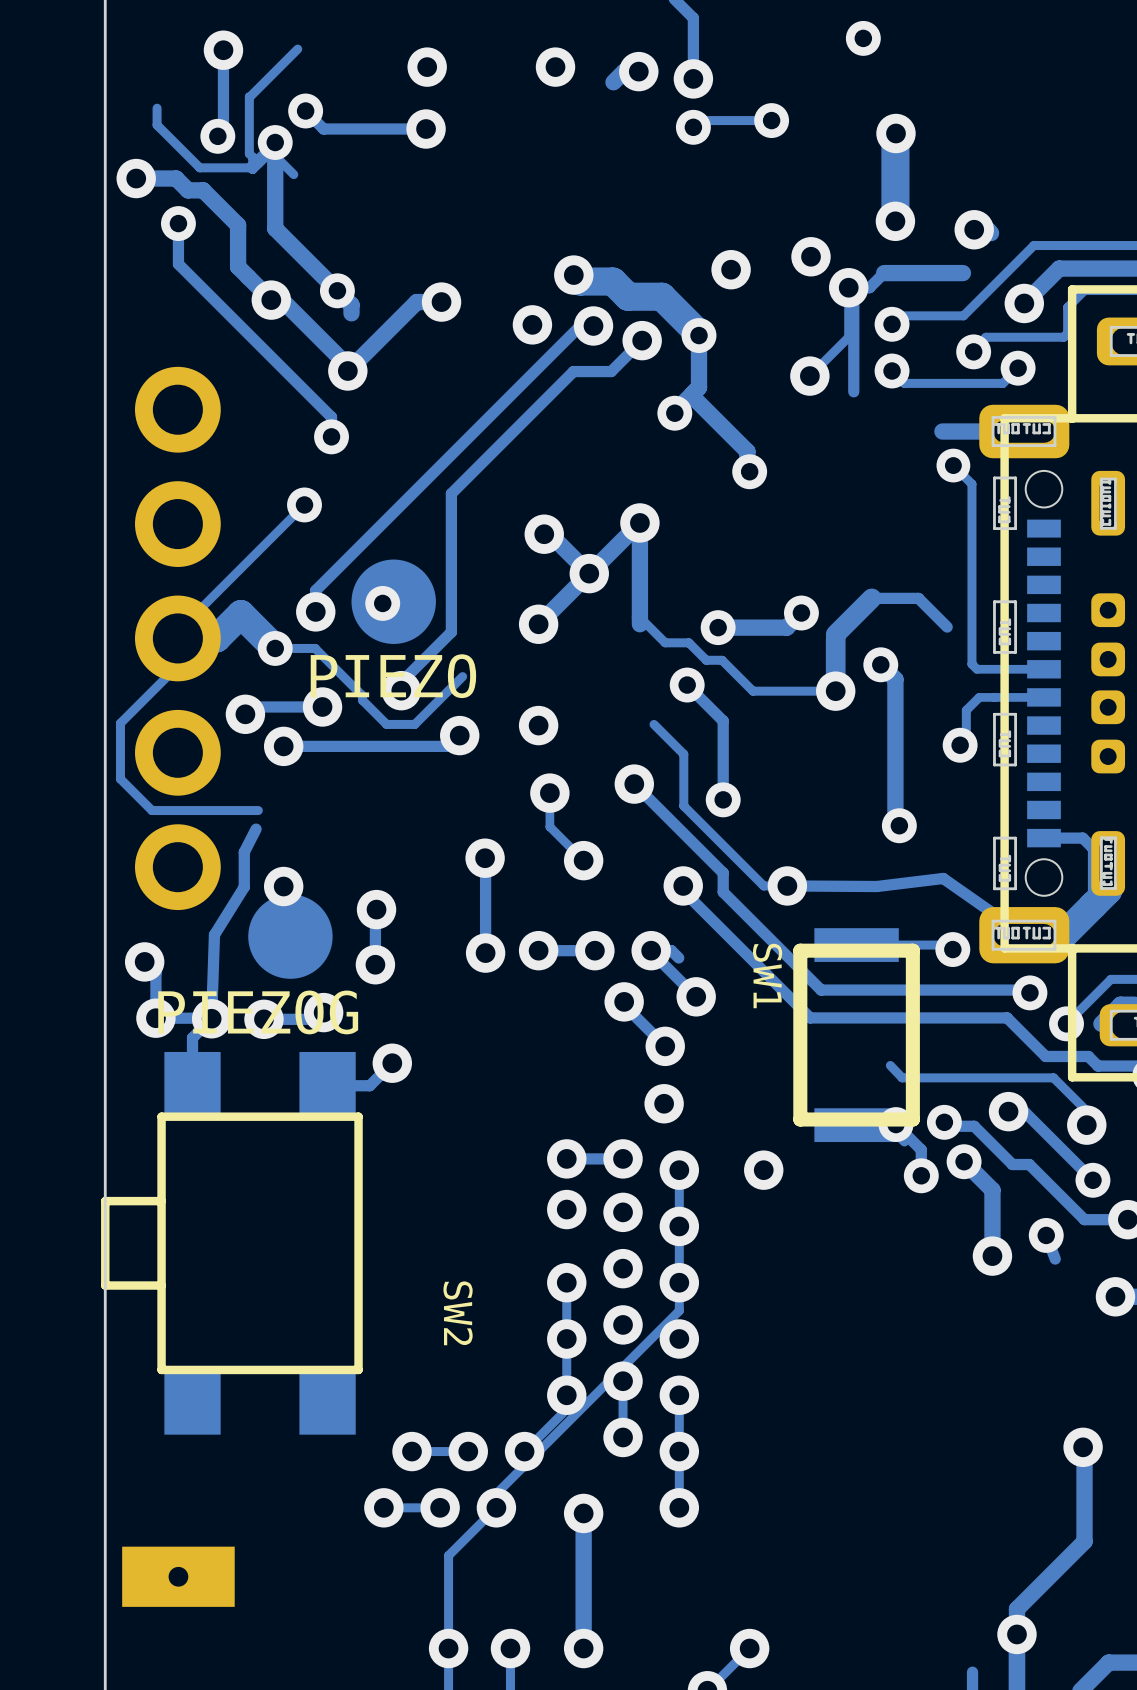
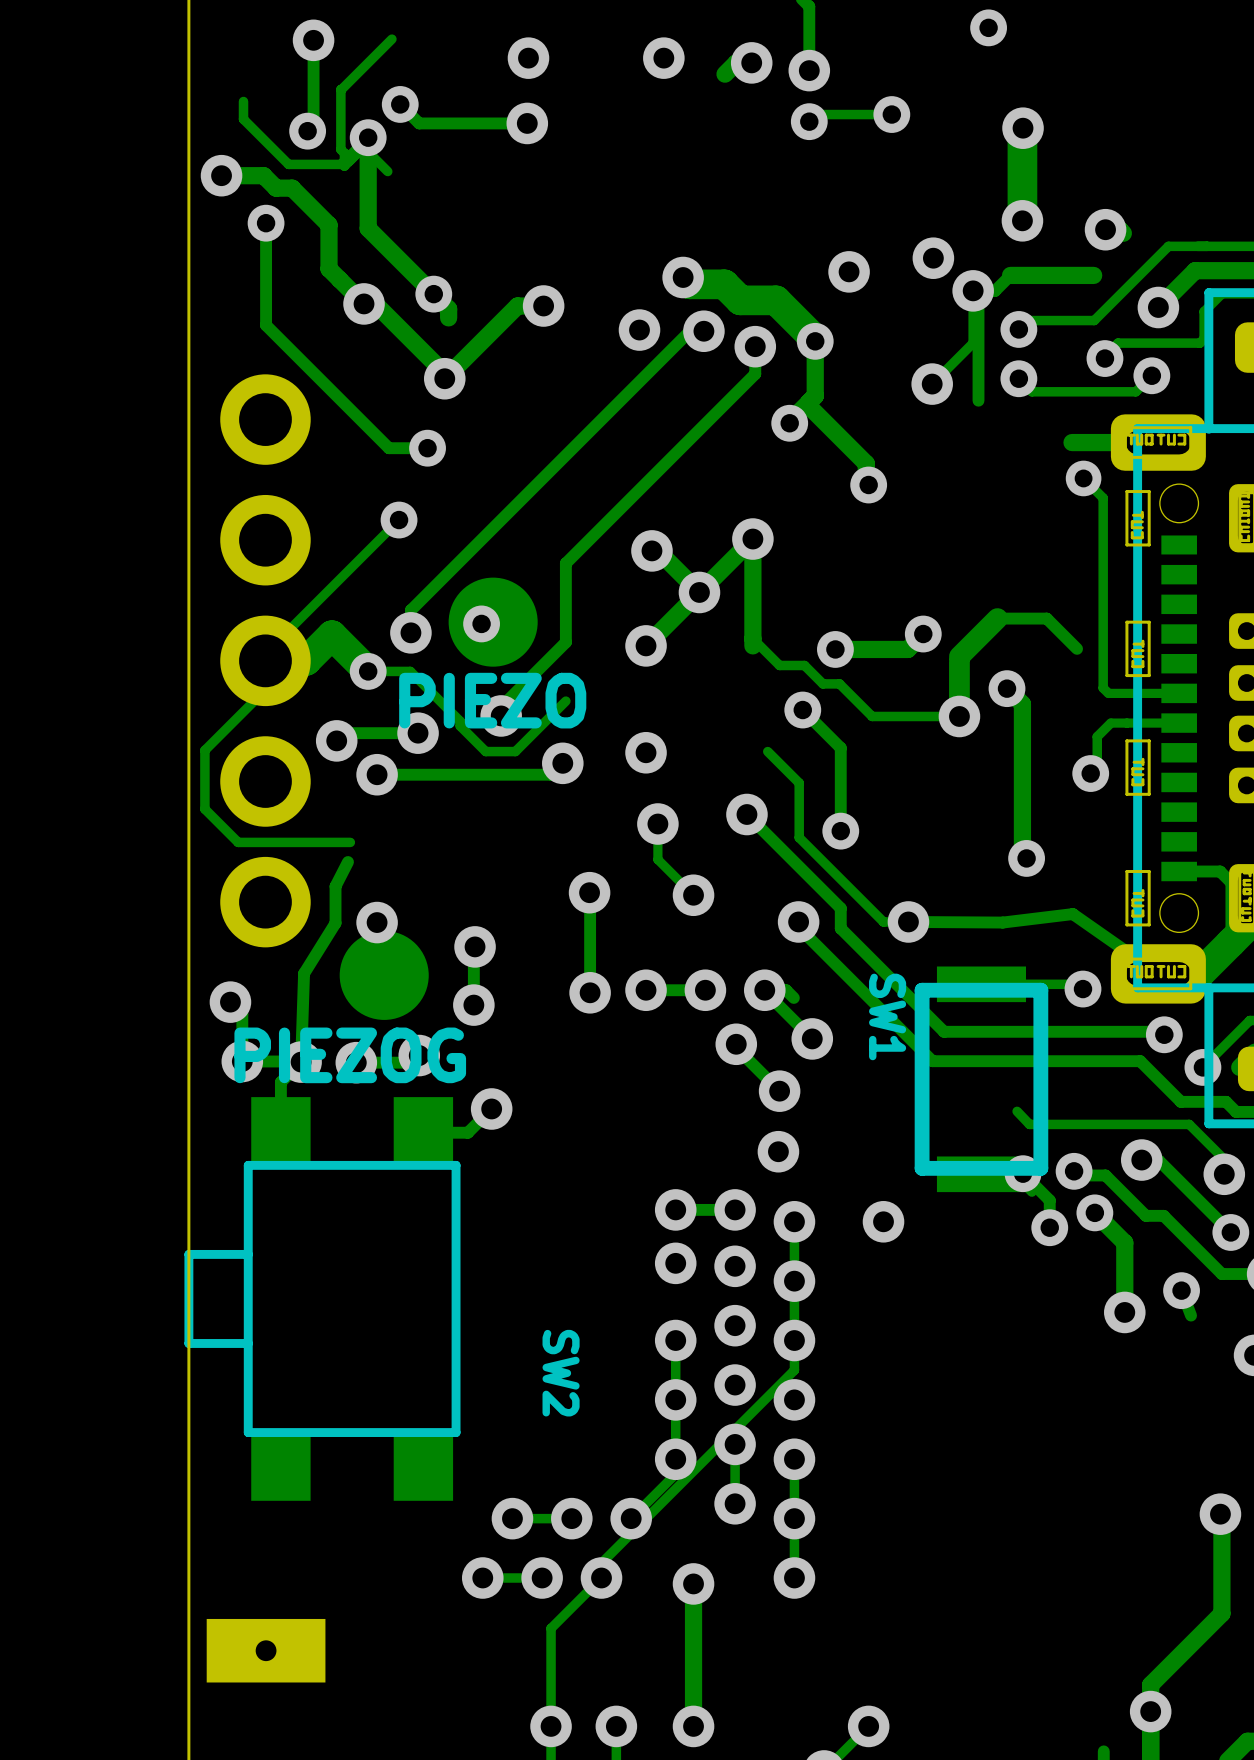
track: (178, 264) (331, 417) (331, 436) -> (266, 265) (266, 325) (388, 448) (427, 448)
track: (642, 340) (611, 371) (573, 371) (451, 493) (451, 632) -> (755, 346) (755, 373) (565, 563) (565, 642) (554, 654)

